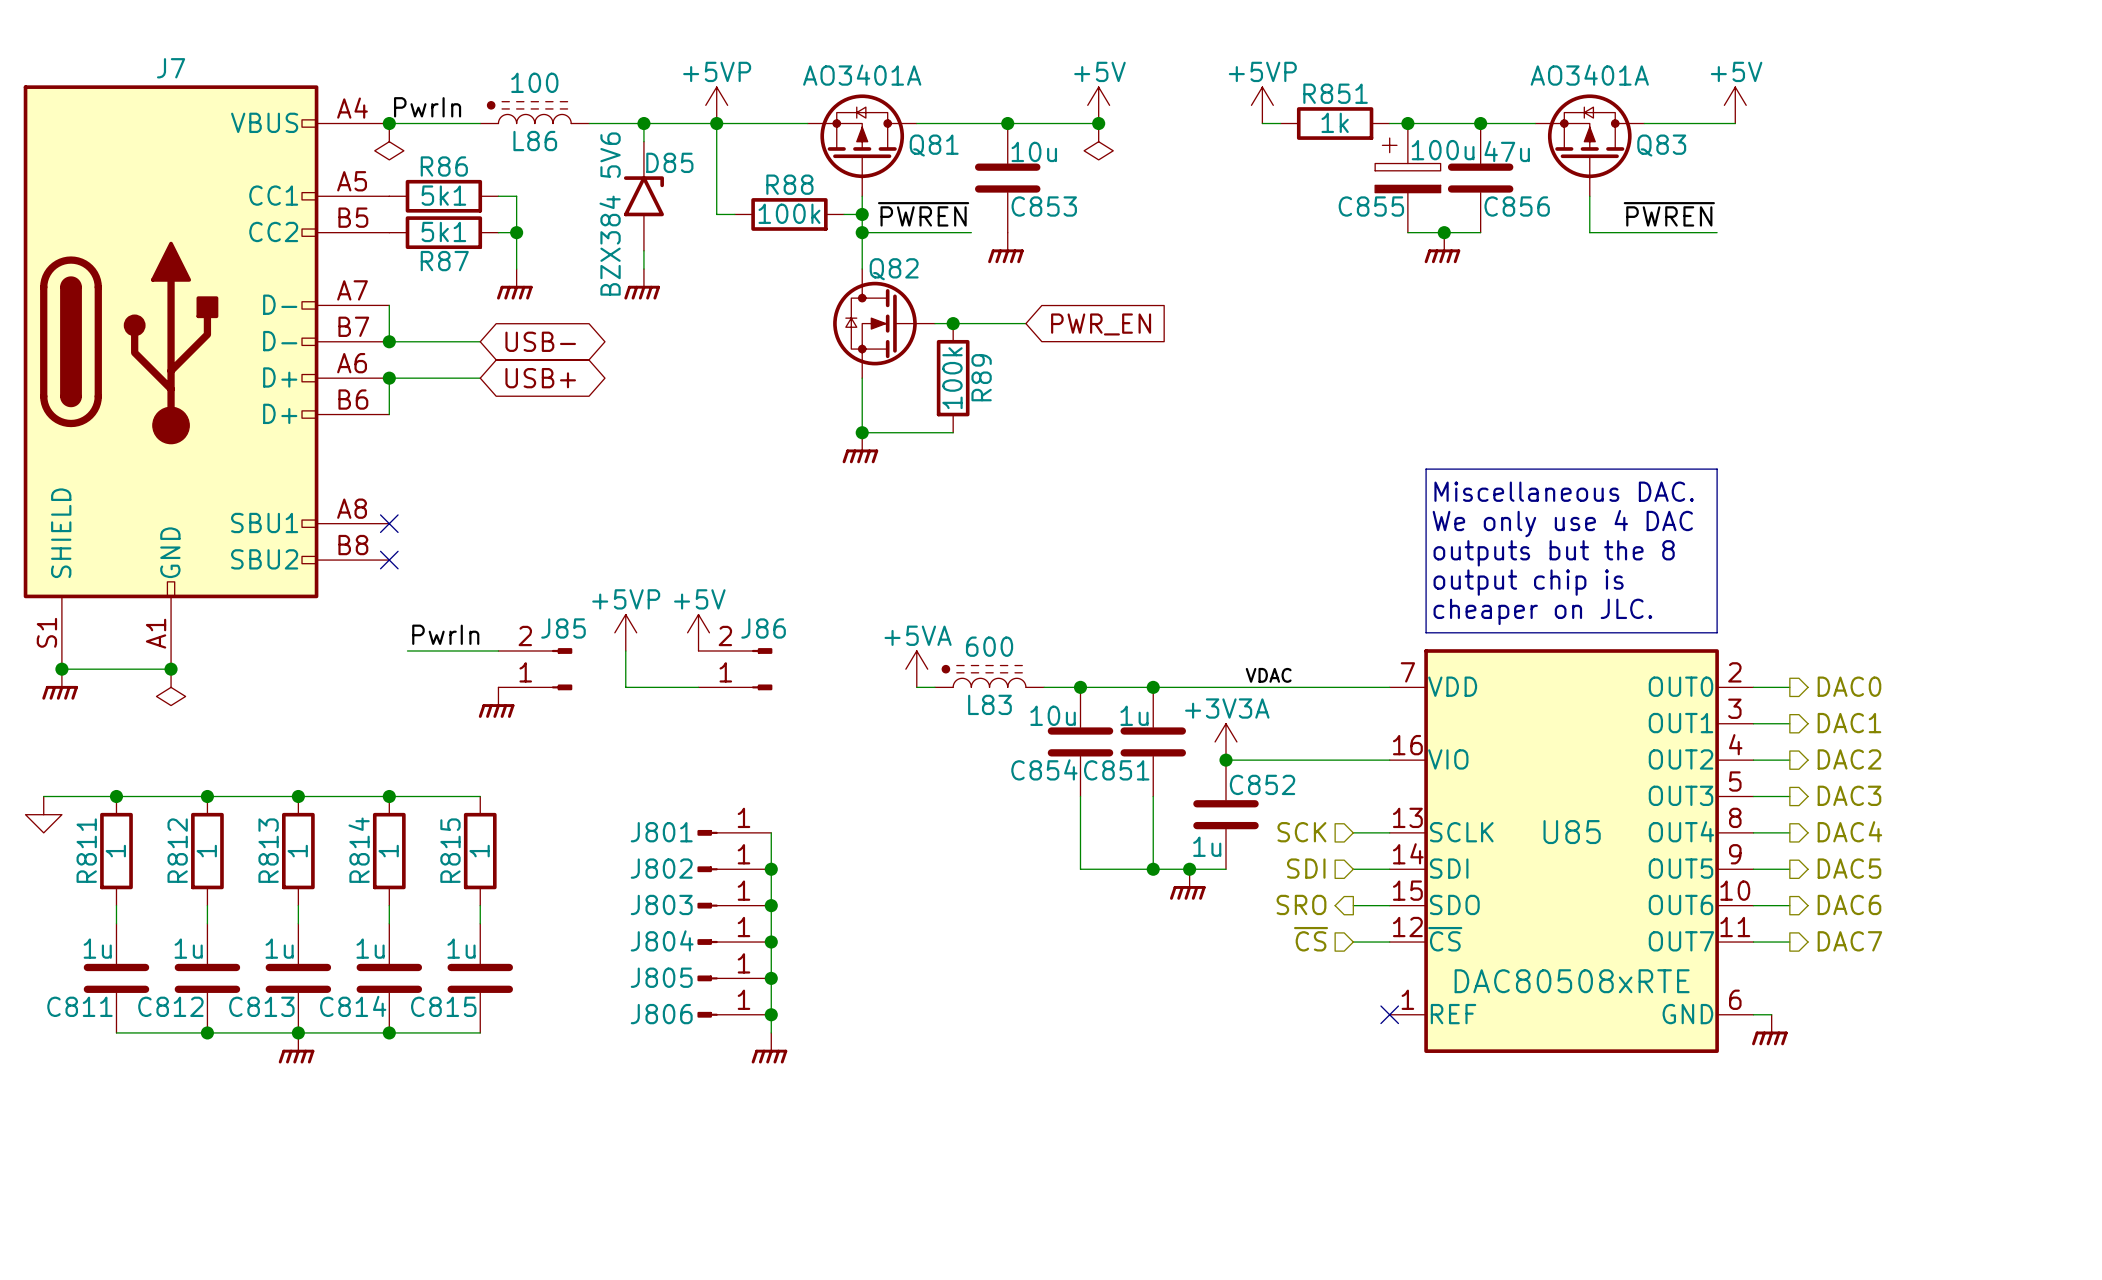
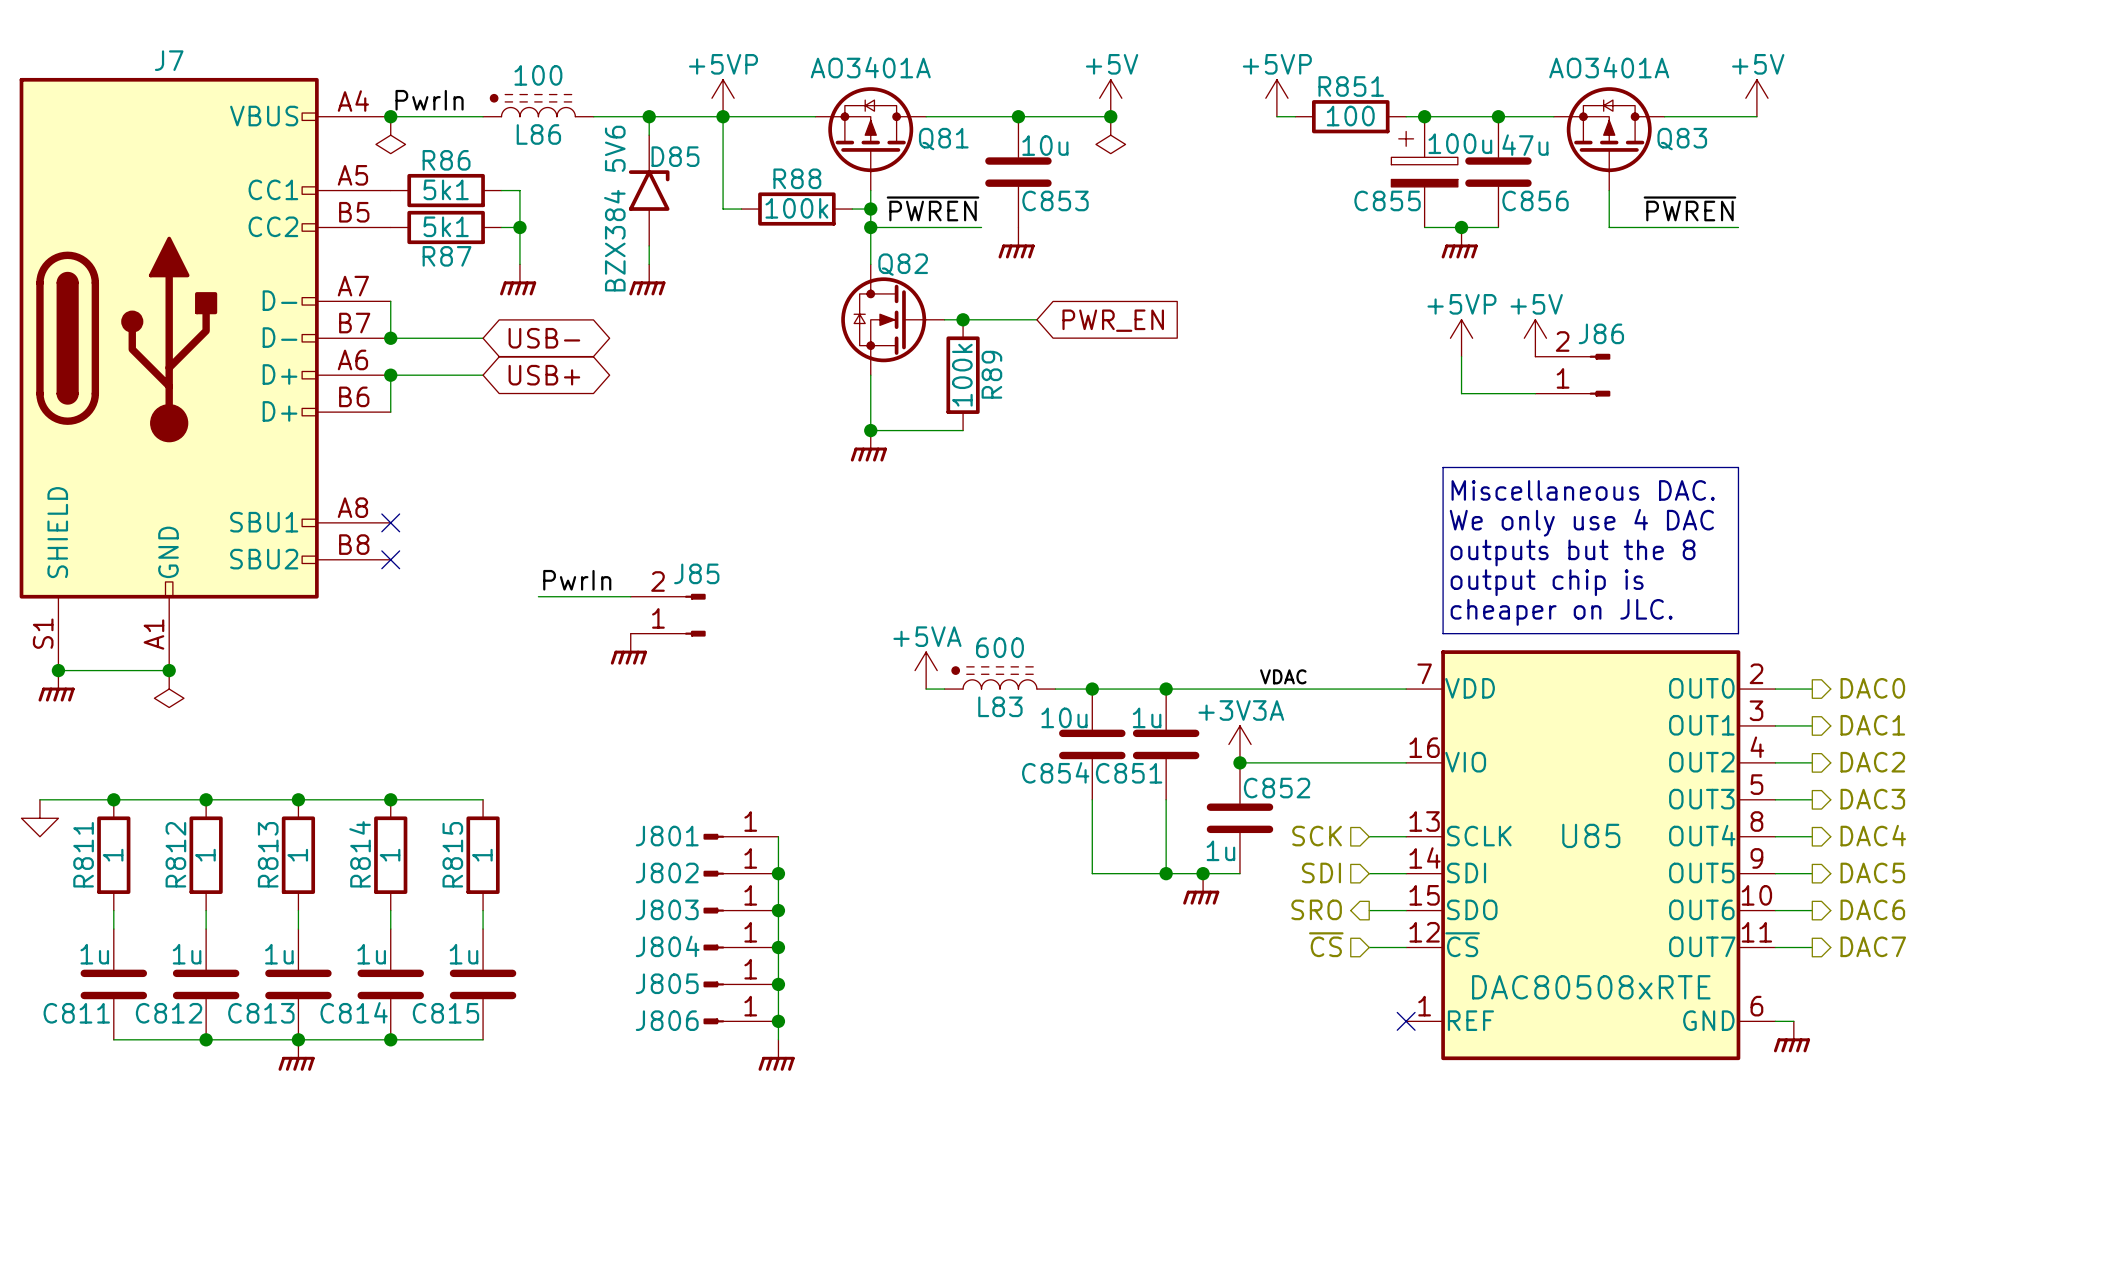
R851 value: 1k (1335, 122) -> 100 (1350, 116)
power symbol: none -> +5VP (1461, 338)
power symbol: none -> +5V (1535, 338)
wire: none -> (1461, 356) (1461, 393) (1535, 393)
power symbol: +5VP (625, 632) -> none
power symbol: +5V (698, 632) -> none
label position: PwrIn (445, 634) -> PwrIn (577, 580)
wire: (407, 650) (498, 650) -> (538, 596) (630, 596)
wire: (625, 650) (625, 687) (698, 687) -> none
J85 position: (535, 669) -> (668, 615)
J86 position: (735, 669) -> (1572, 375)
power symbol position: (496, 702) -> (628, 649)

